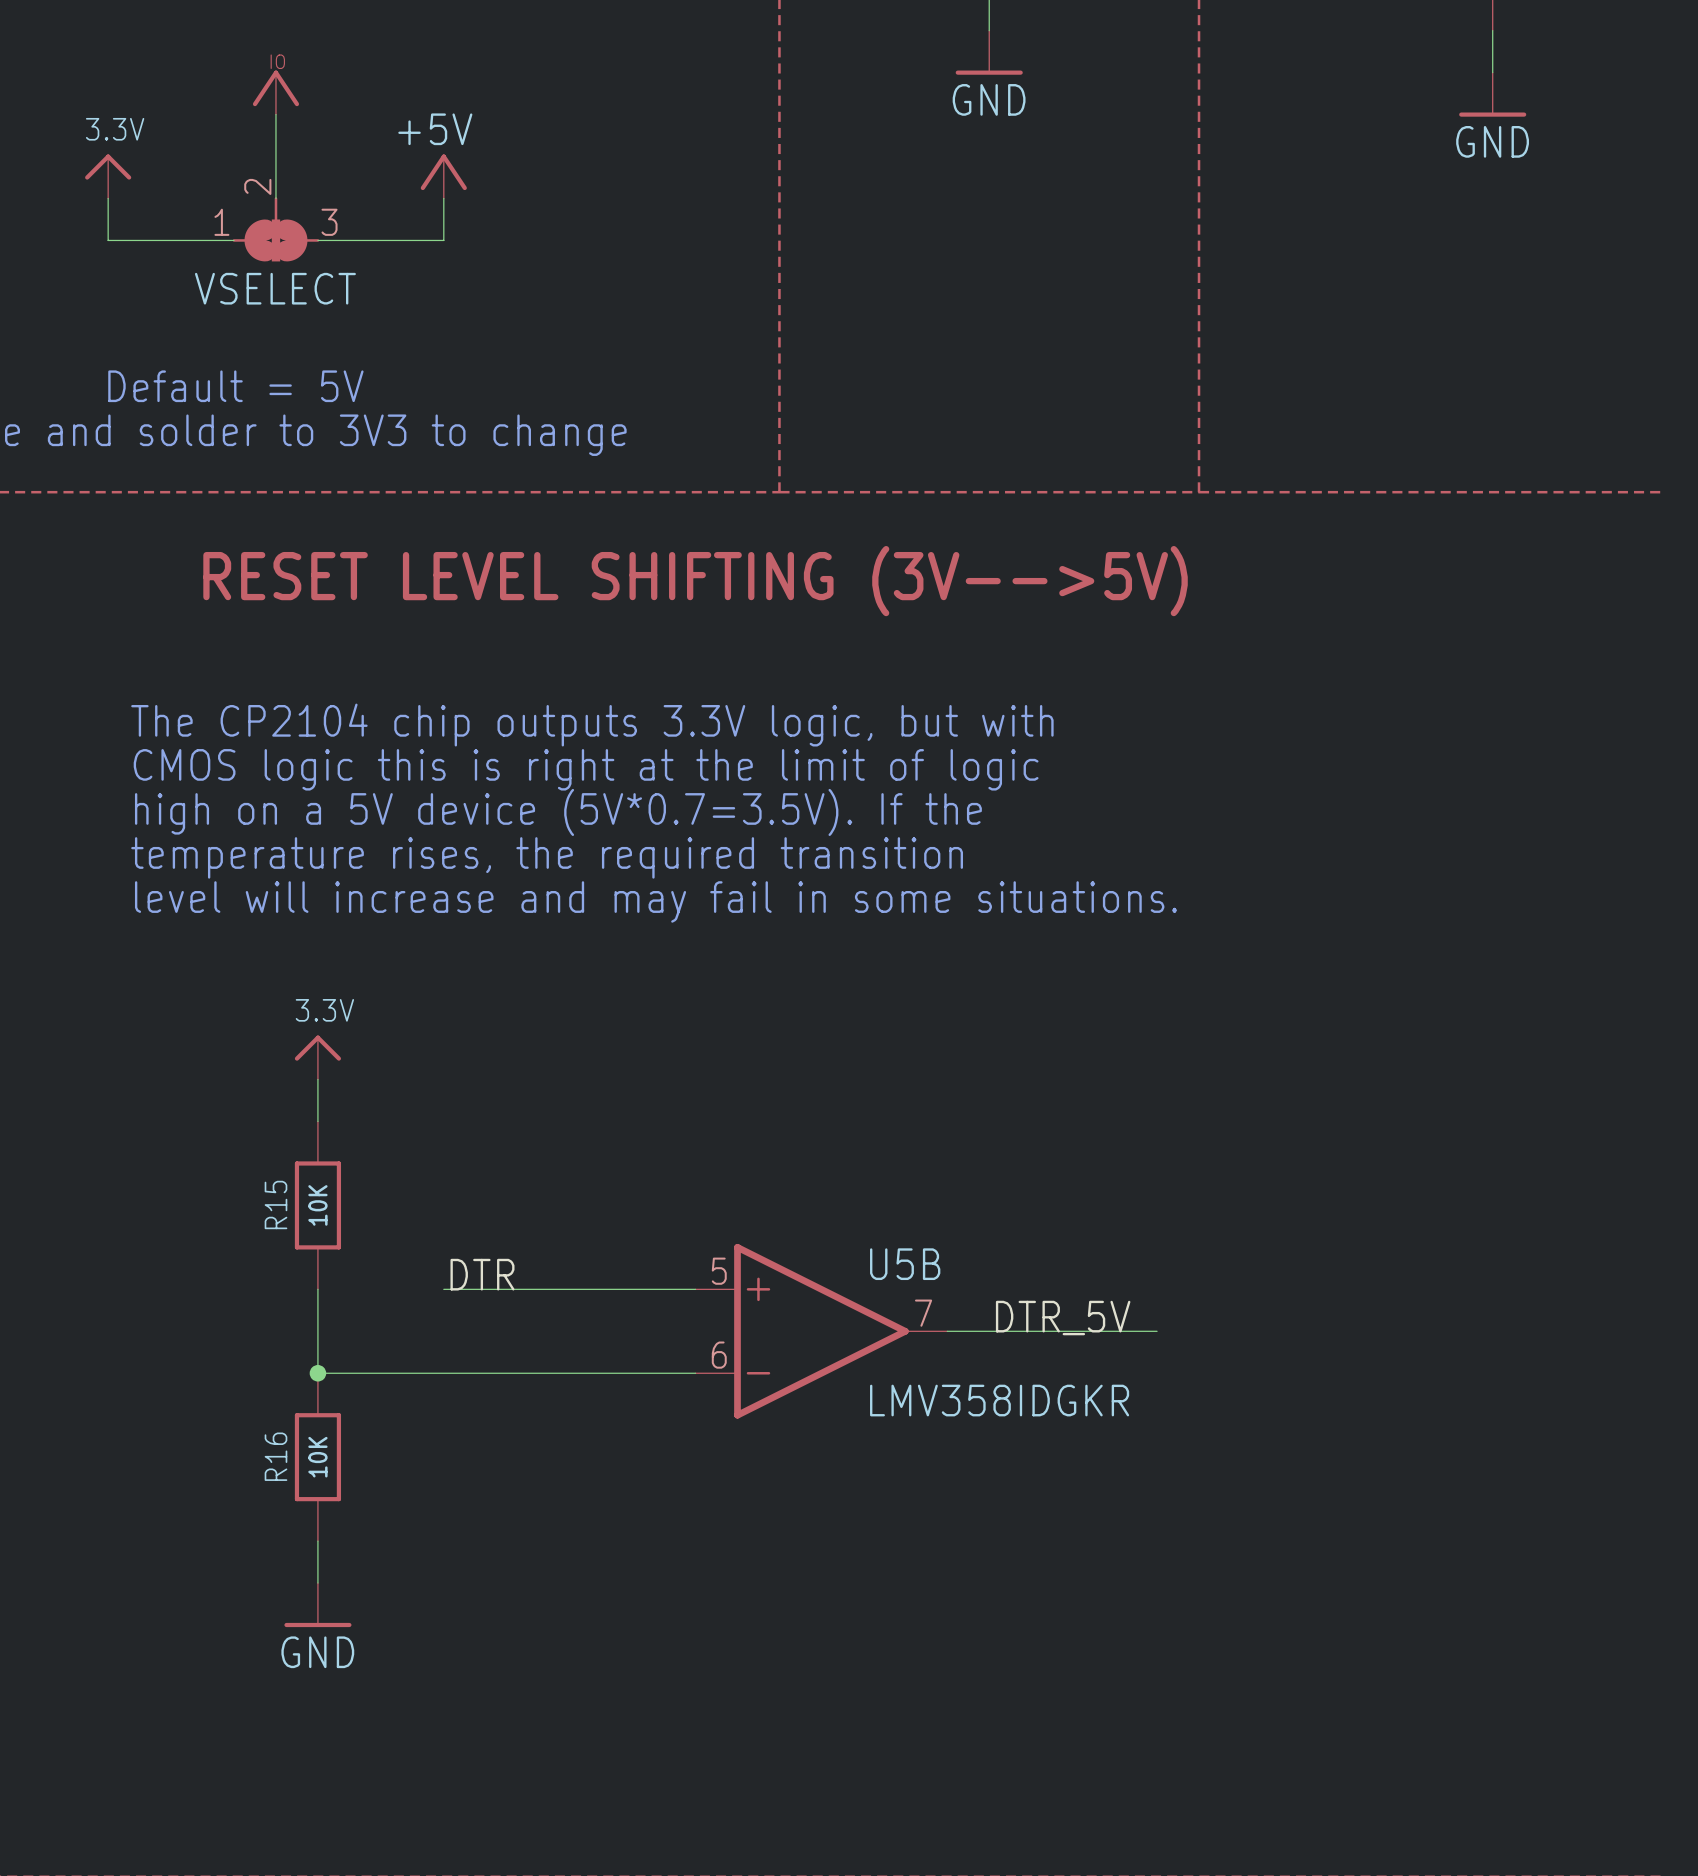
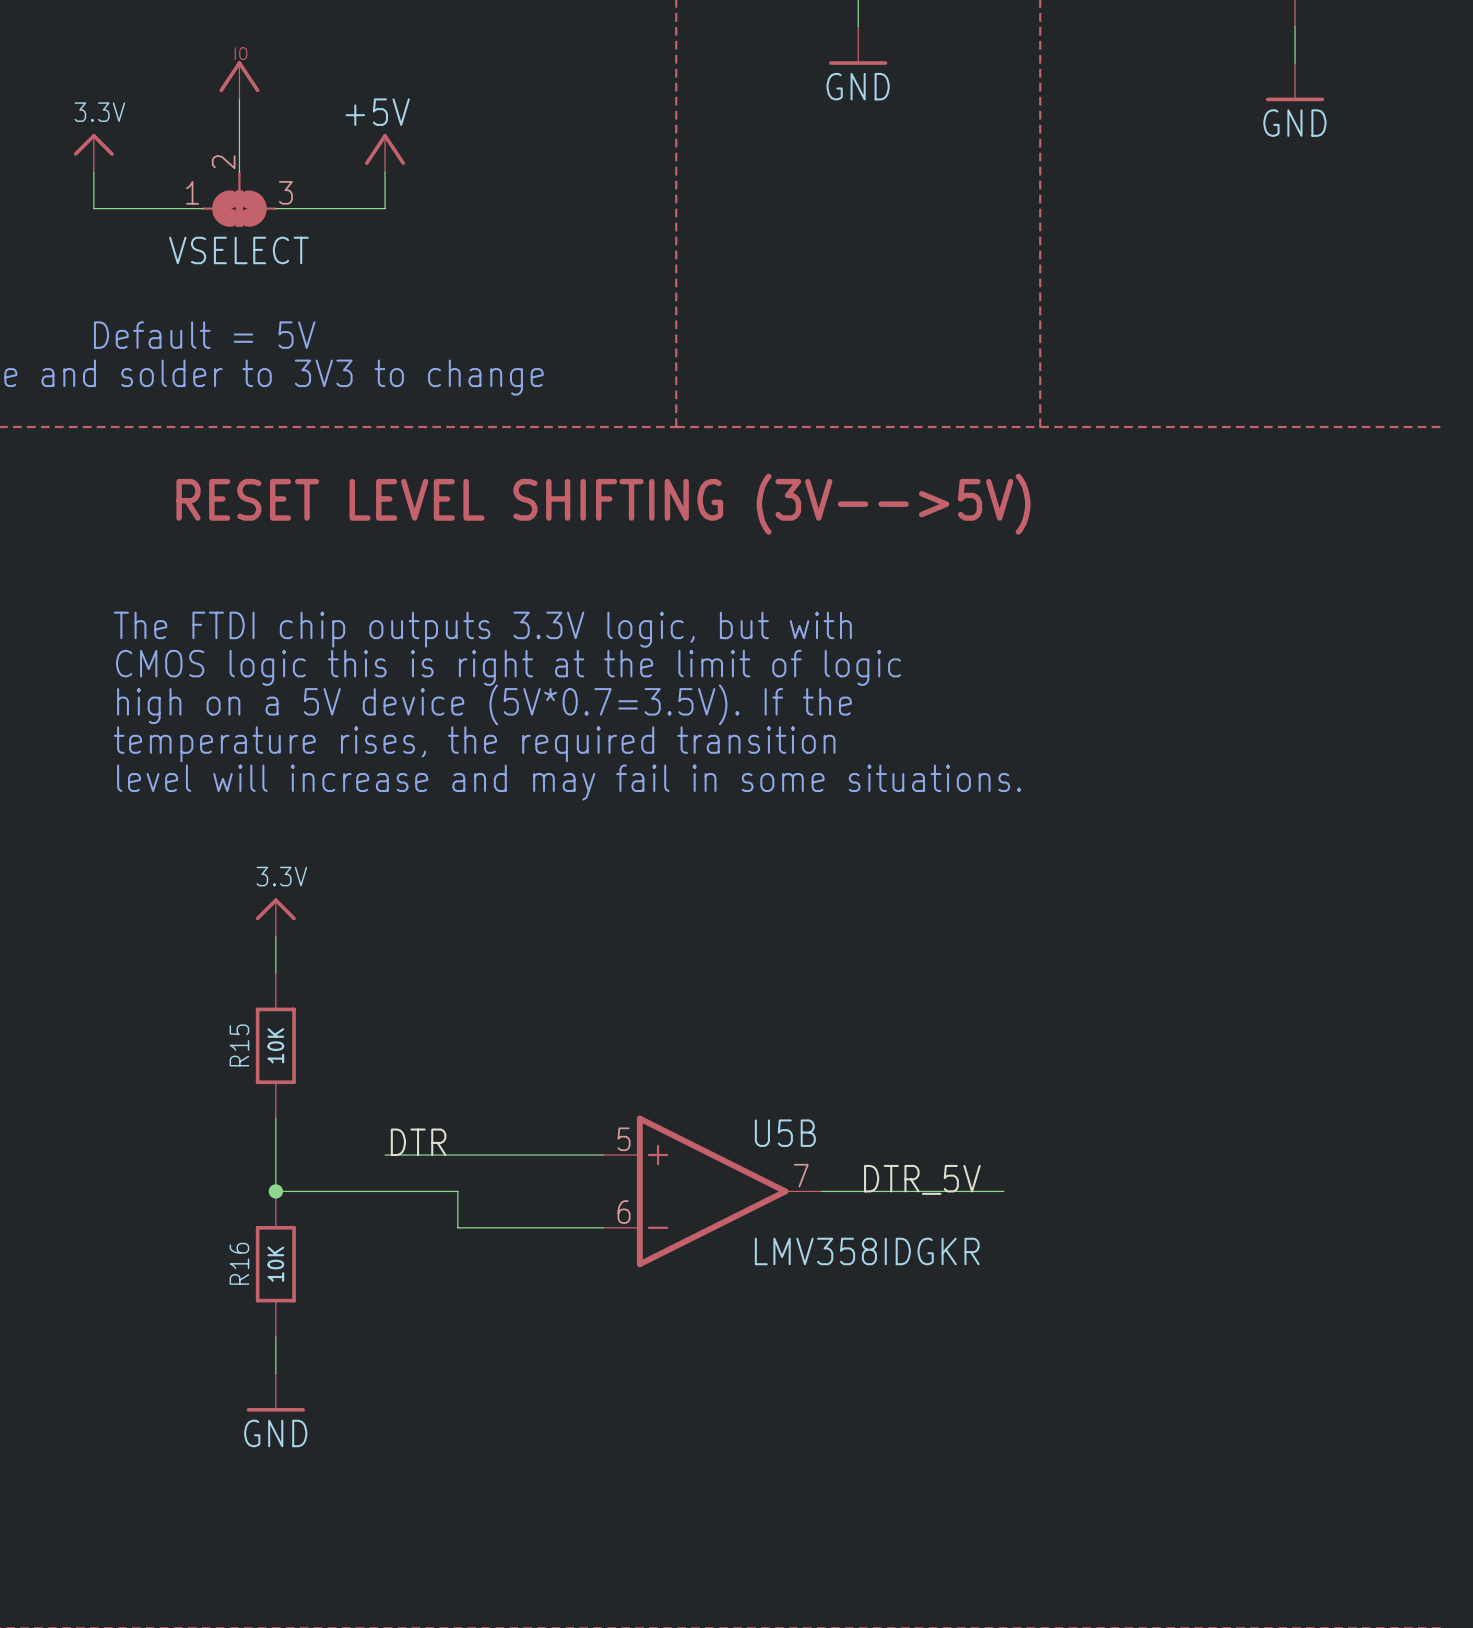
text: The CP2104 chip outputs 3.3V logic, but with (592, 725) -> The FTDI chip outputs 3.3V logic, but with (482, 629)
label position: DTR (482, 1274) -> DTR (418, 1142)
wire: (443, 1289) (695, 1289) -> (385, 1155) (603, 1155)
label position: DTR_5V (1063, 1318) -> DTR_5V (922, 1179)
U5B position: (821, 1331) -> (712, 1191)
wire: (947, 1331) (1157, 1331) -> (821, 1191) (1003, 1191)
wire: (527, 1373) (695, 1373) -> (457, 1191) (457, 1227) (603, 1227)

